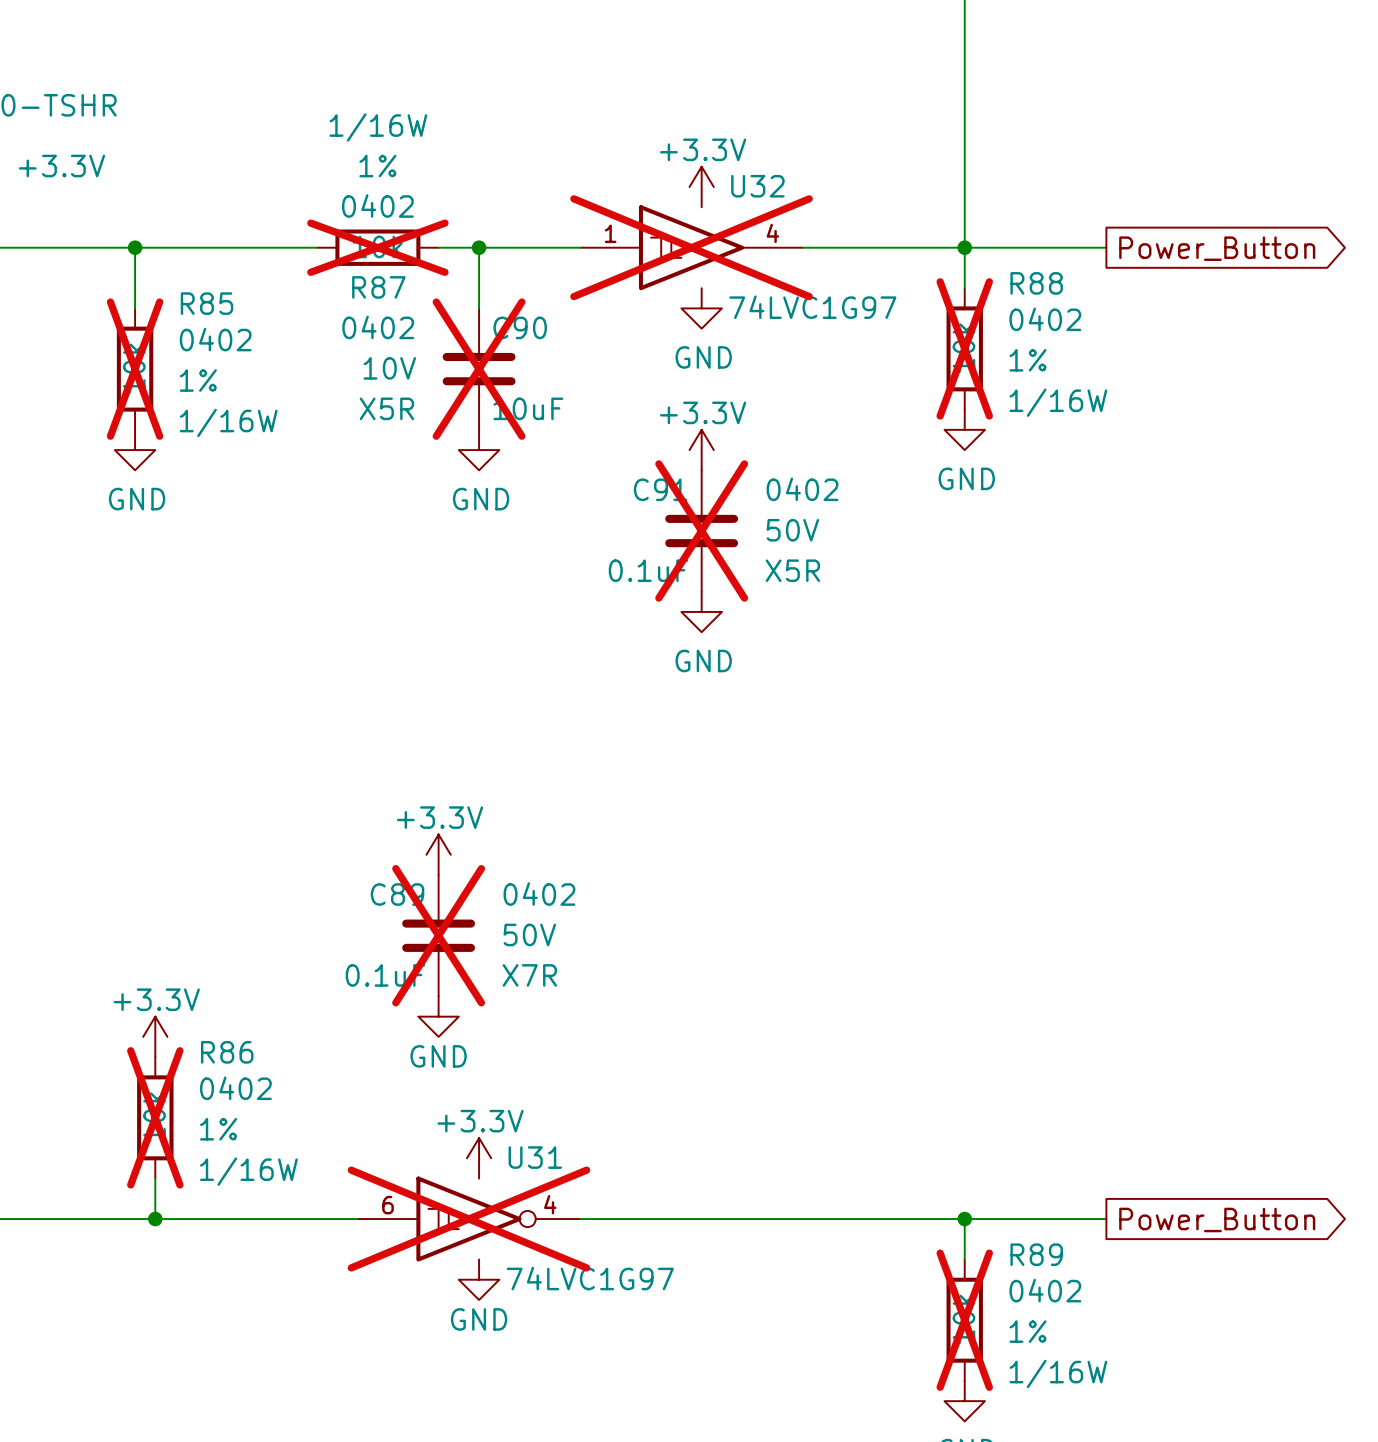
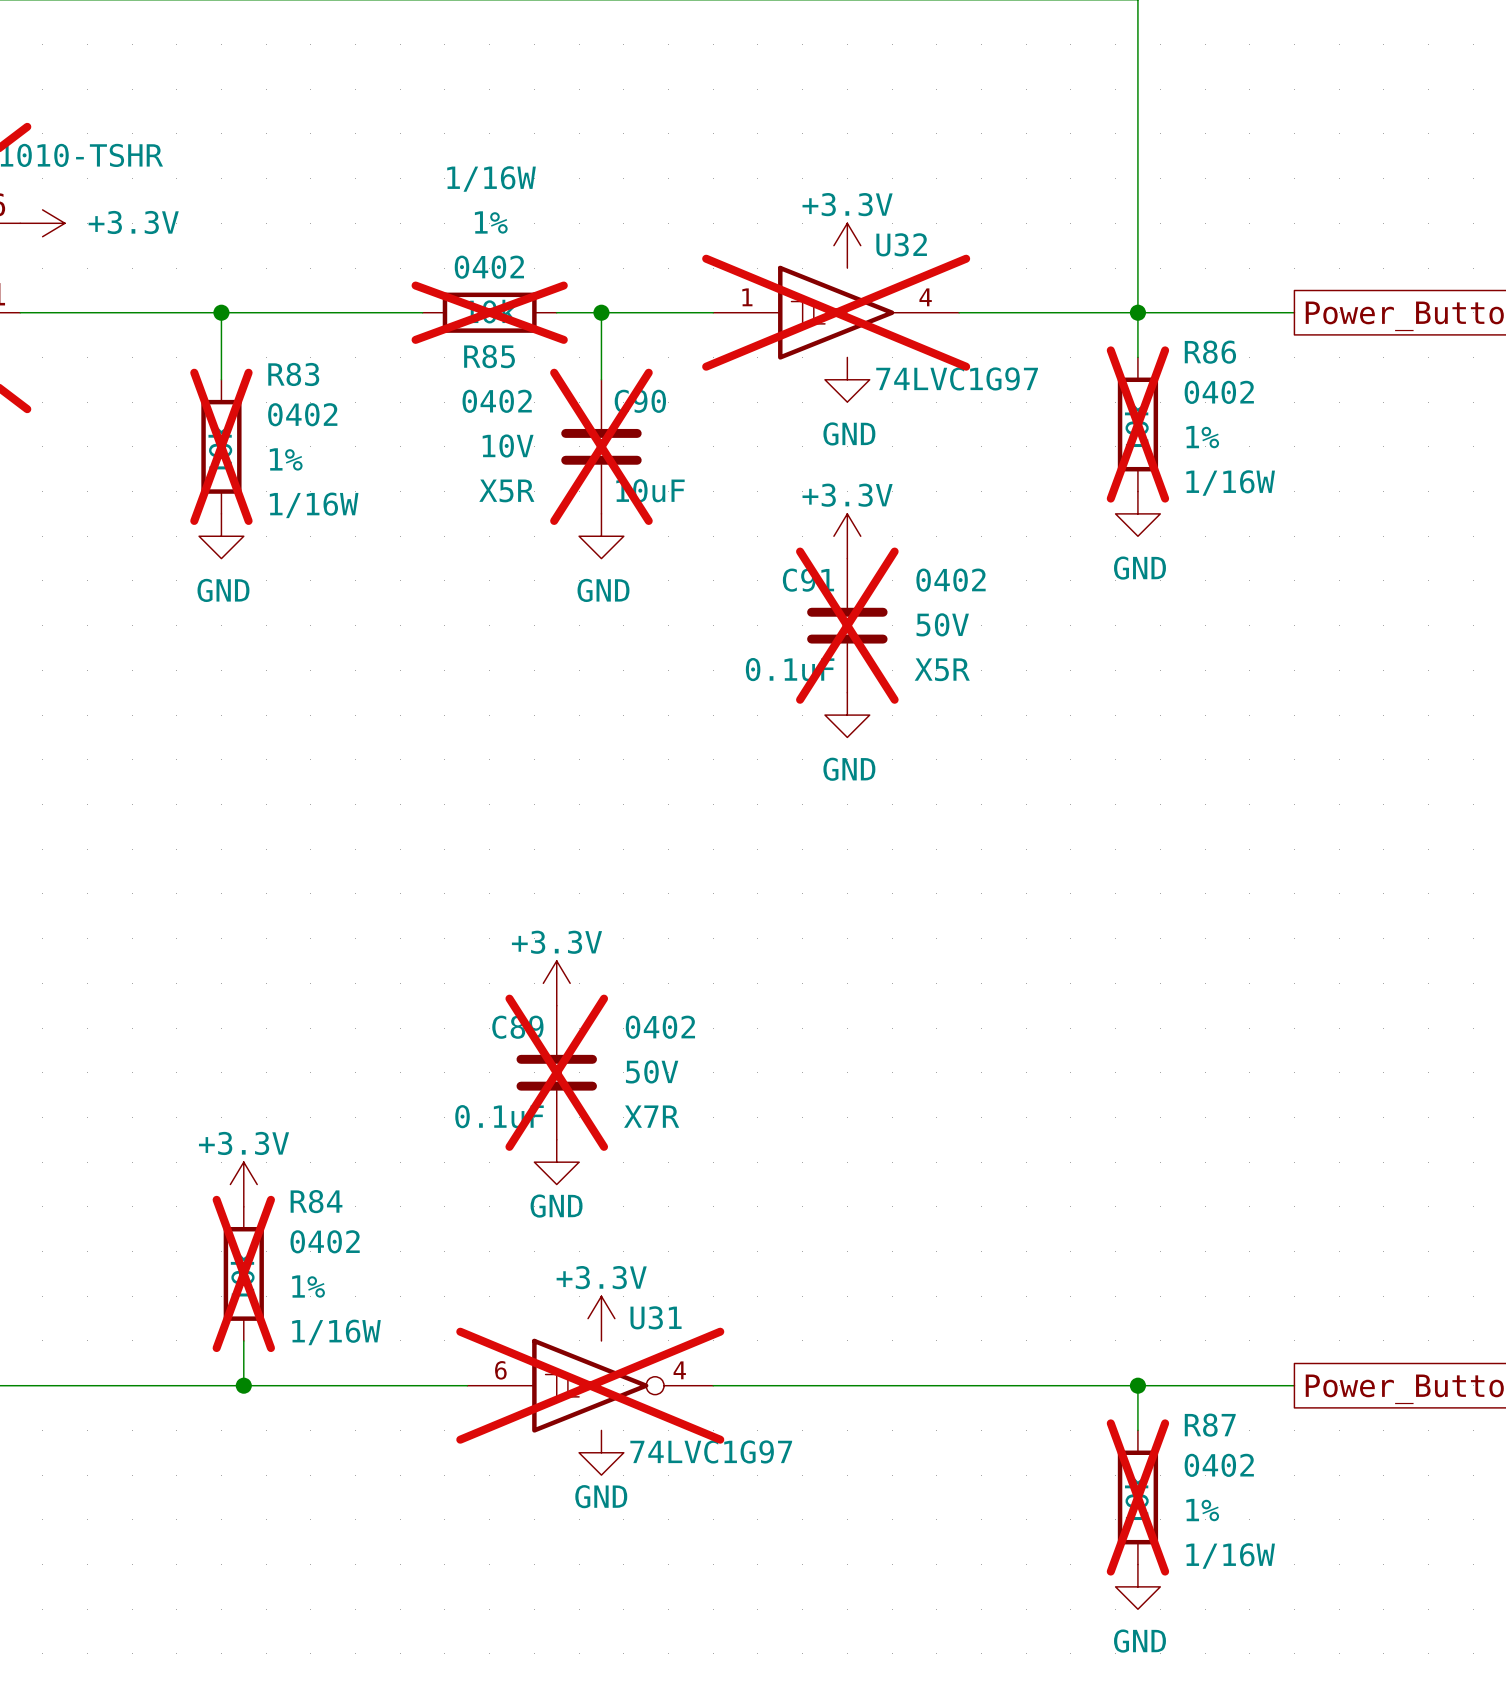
R88 name: R88 (1036, 283) -> R86 (1210, 352)
R87 name: R87 (378, 287) -> R85 (489, 356)
R85 name: R85 (207, 303) -> R83 (293, 374)
R86 name: R86 (227, 1052) -> R84 (316, 1201)
R89 name: R89 (1036, 1254) -> R87 (1210, 1425)

